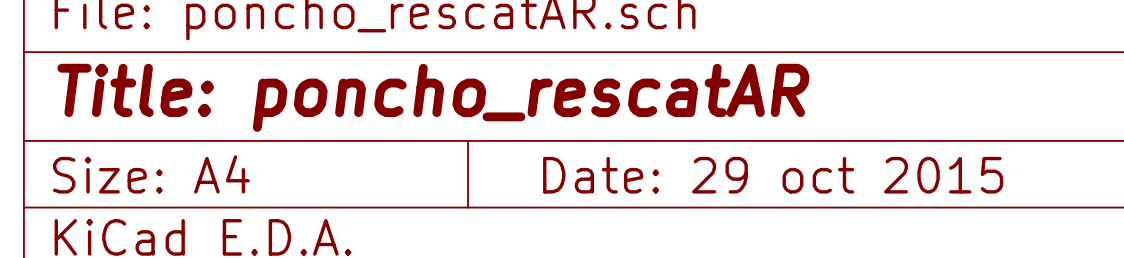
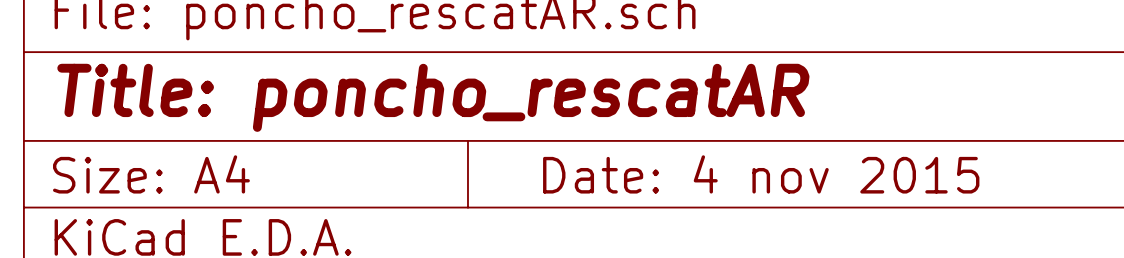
title block: Date: 29 oct 2015 (773, 175) -> Date: 4 nov 2015 (761, 174)

